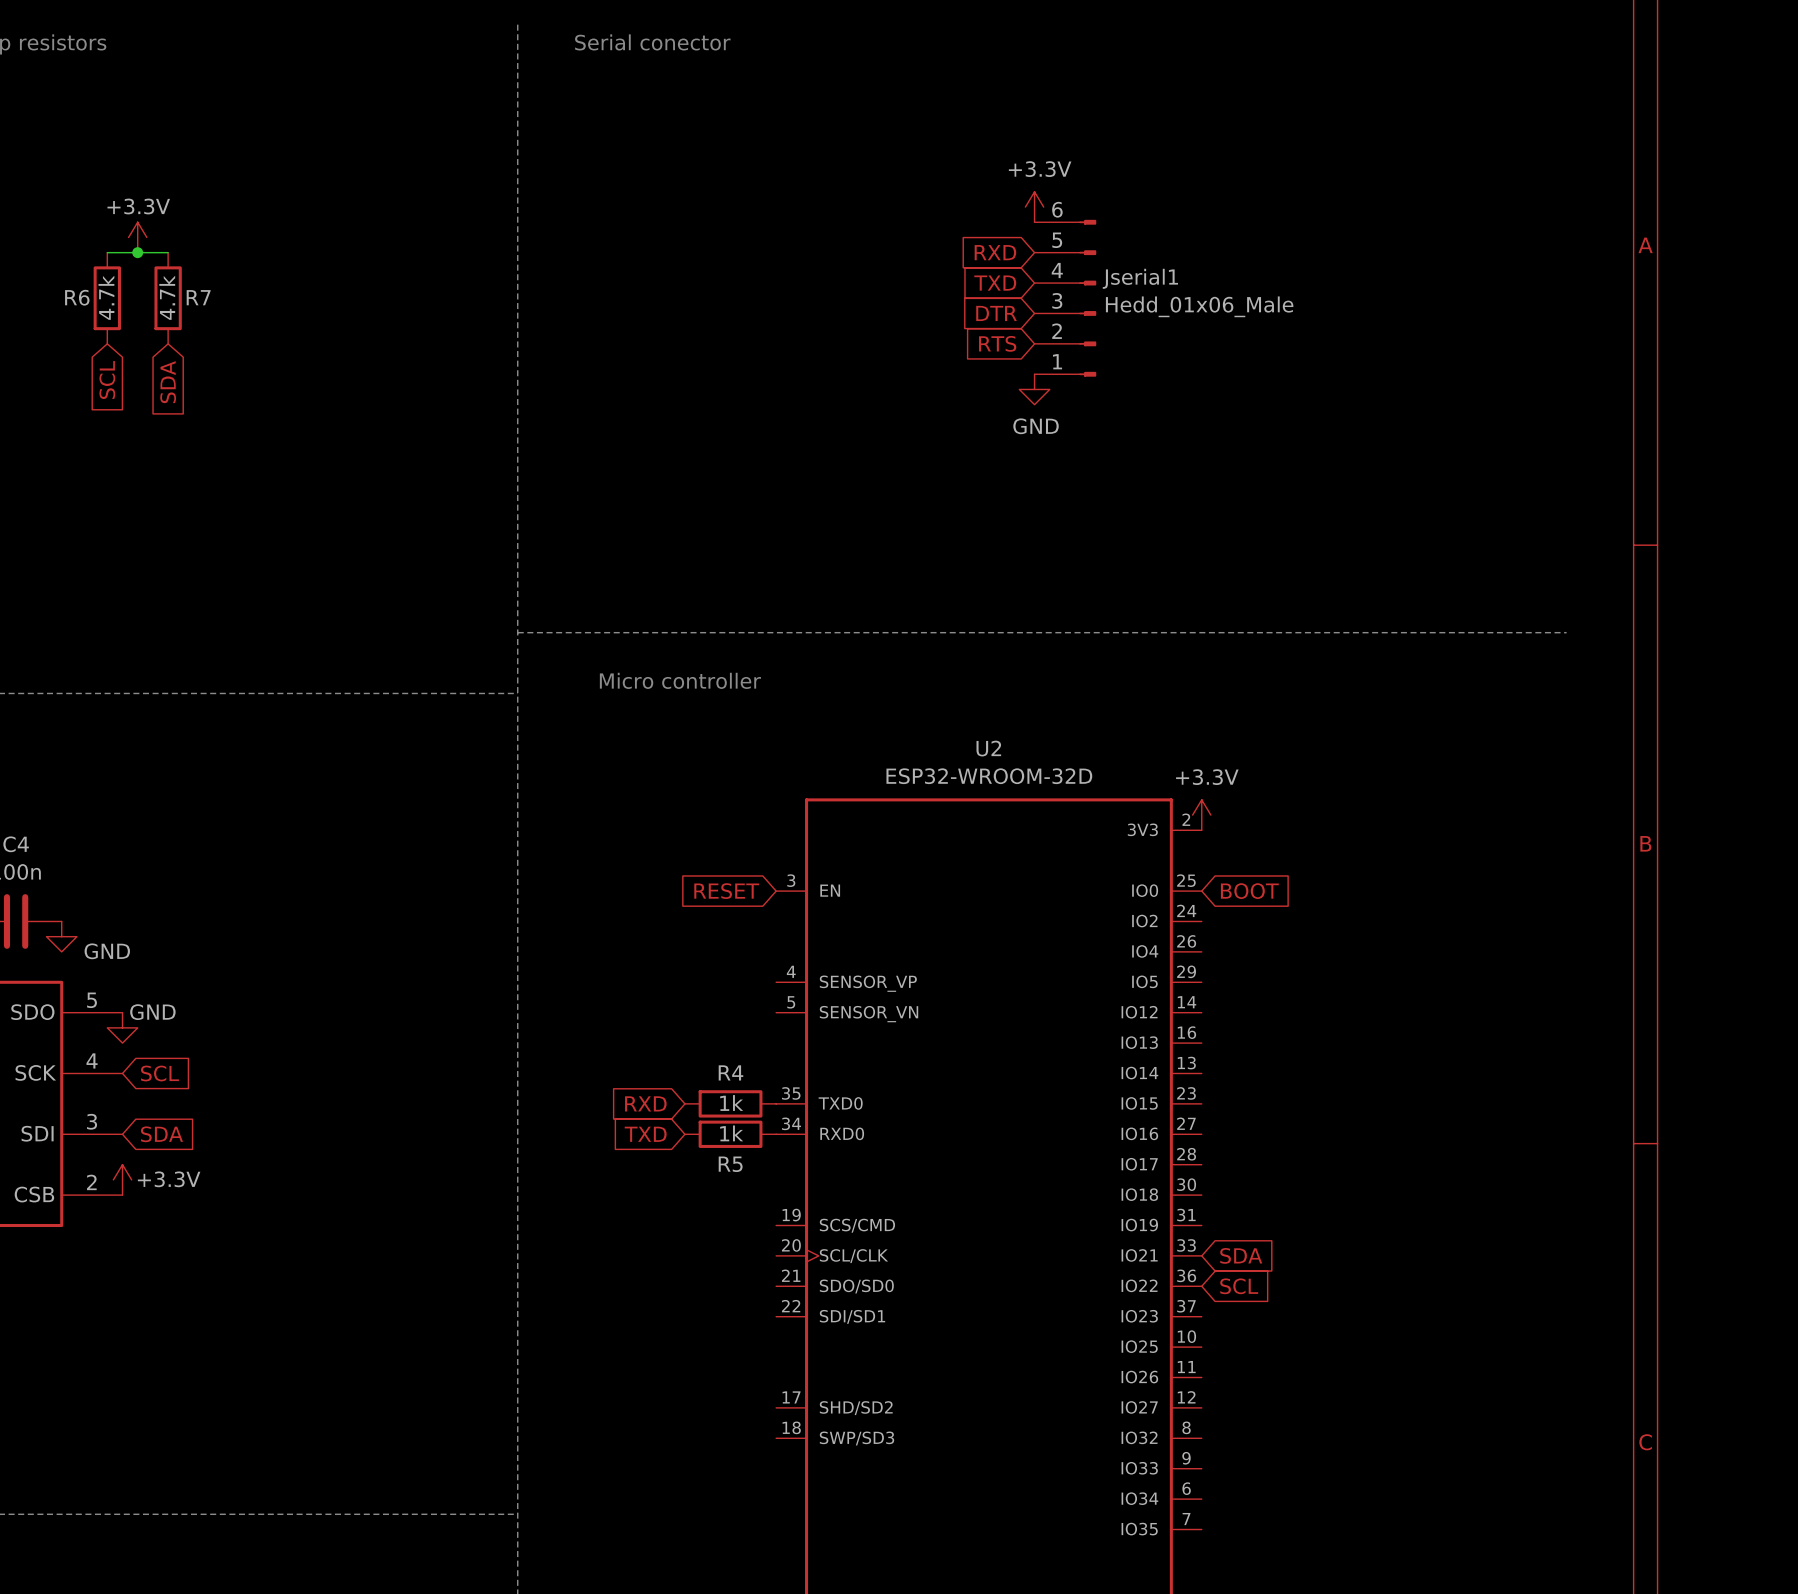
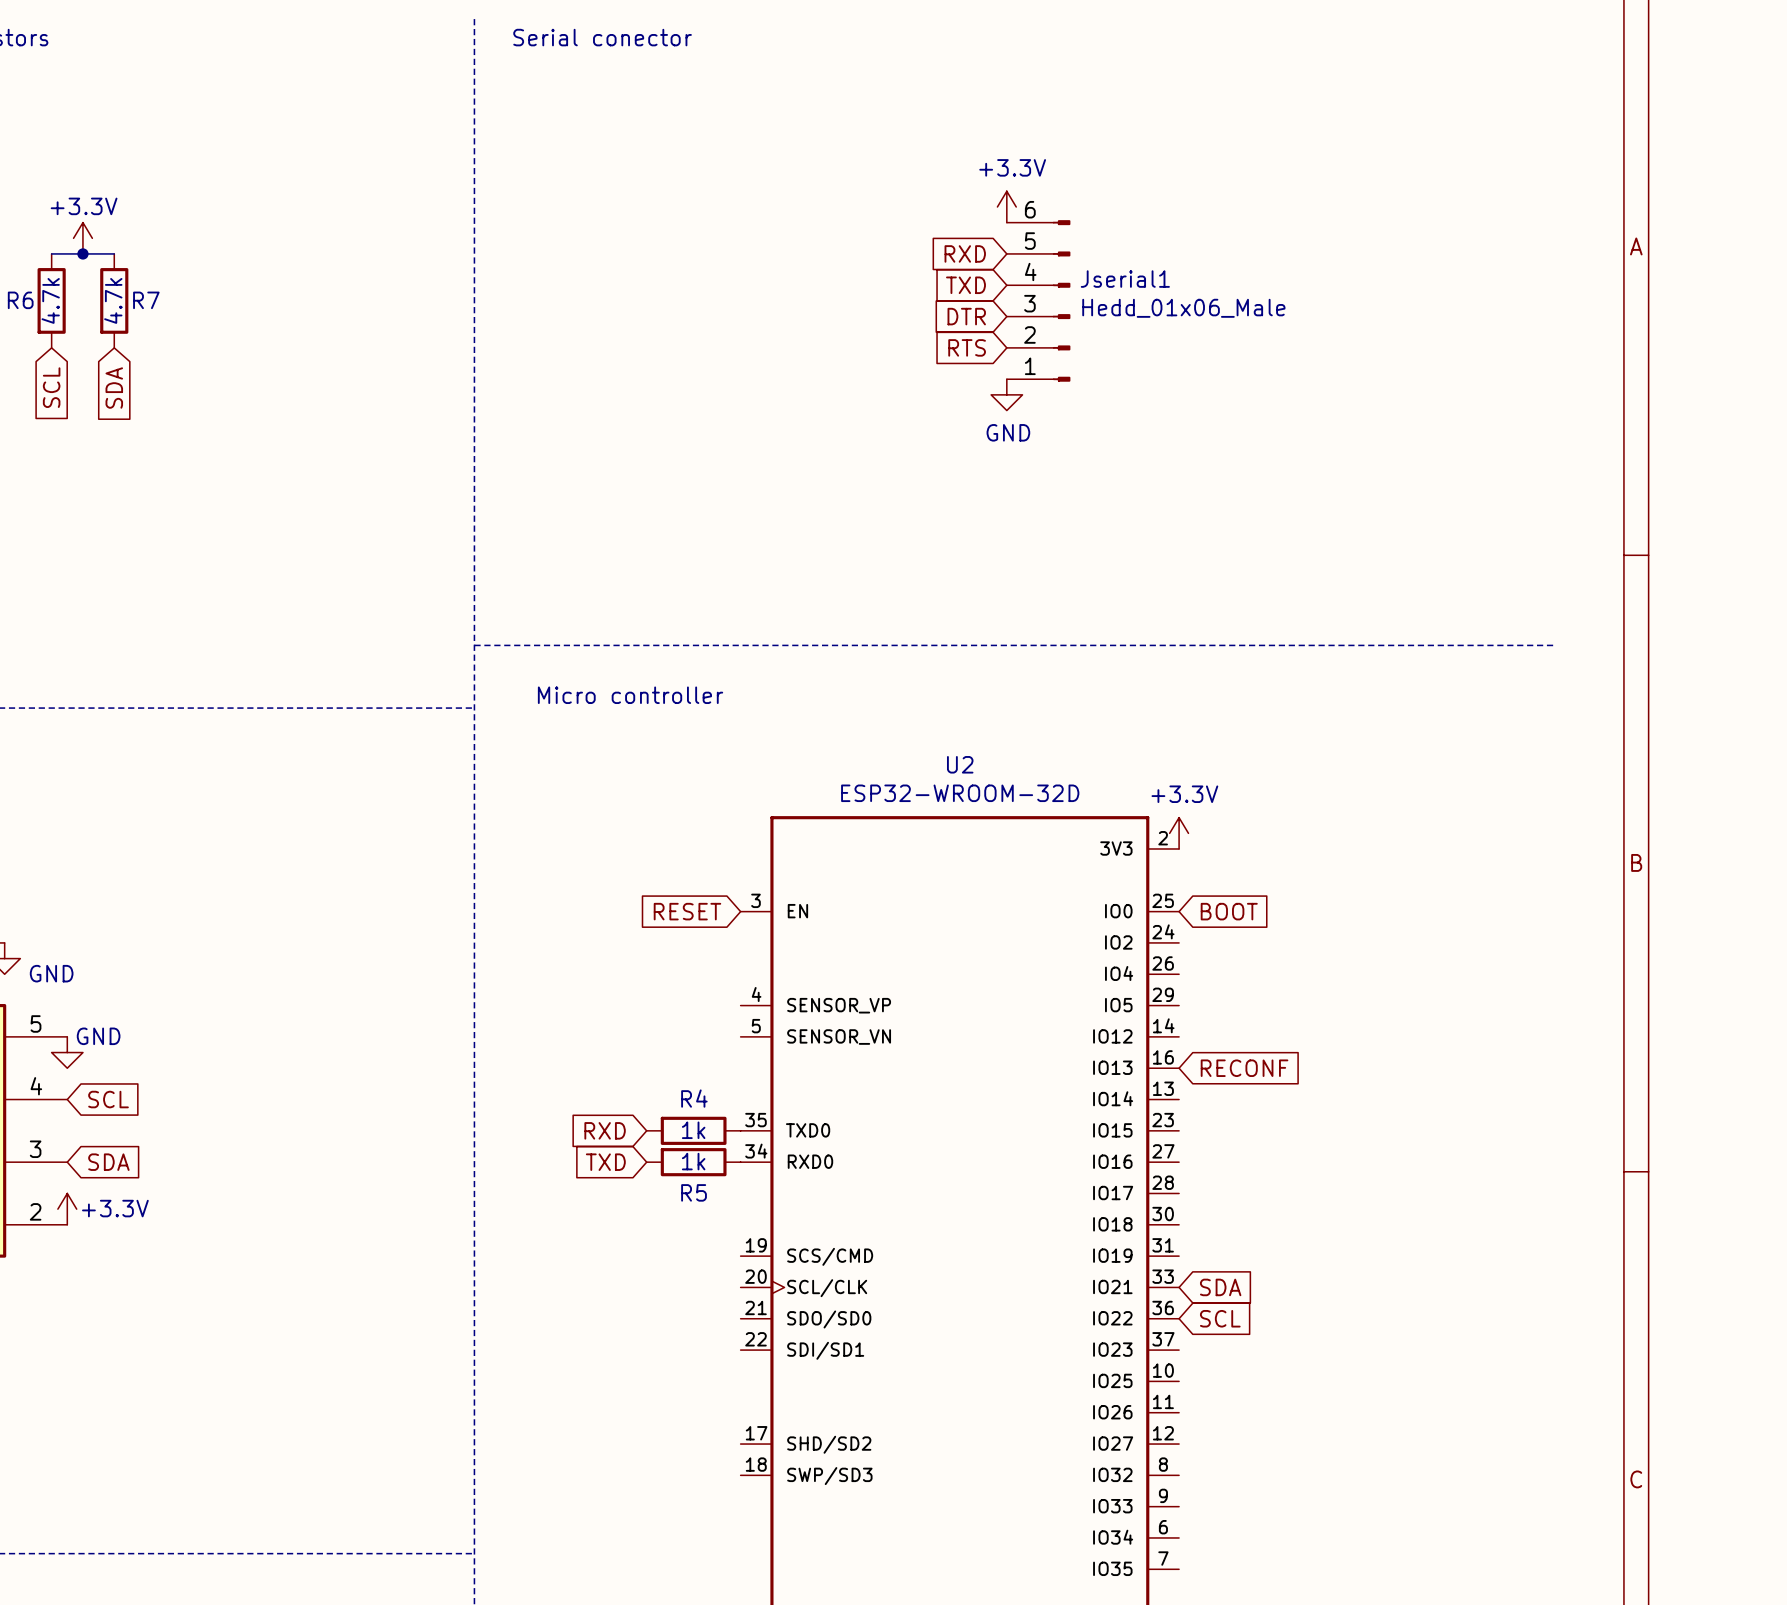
global label: none -> RECONF (1244, 1068)

